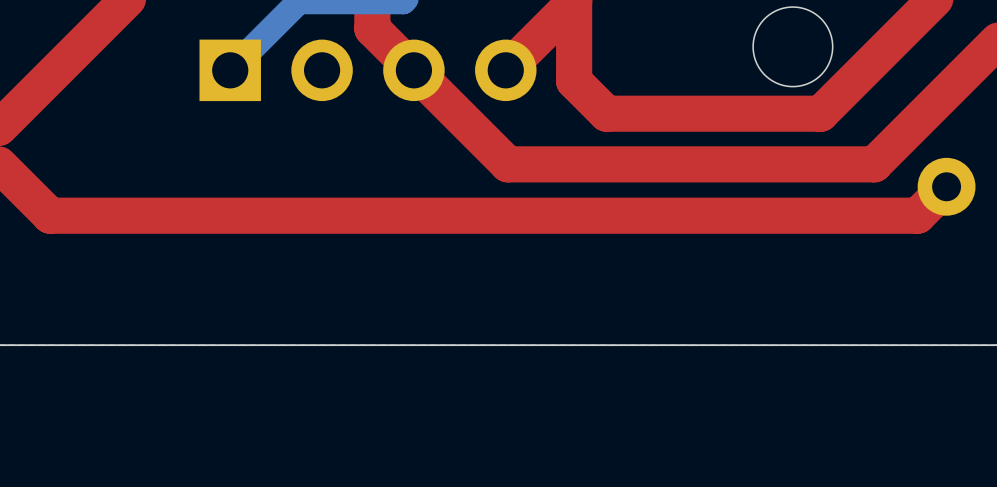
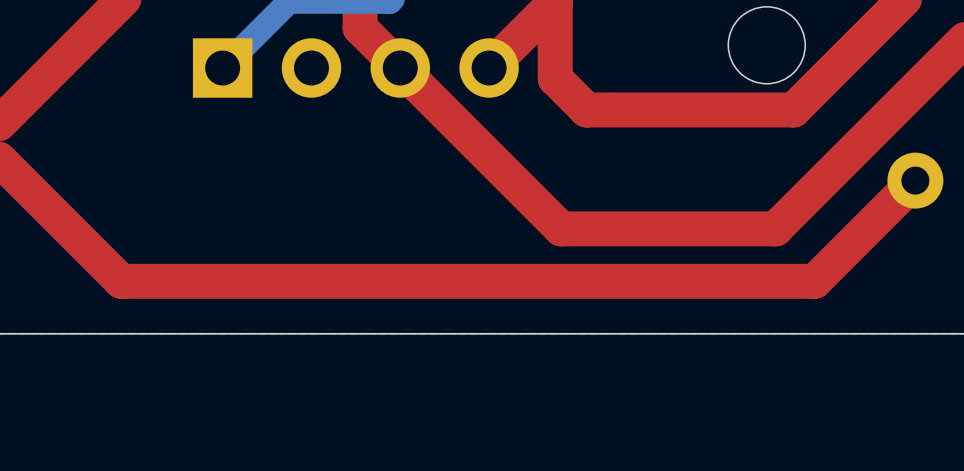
top track: (874, 164) (507, 164) -> (845, 158) (775, 228) (561, 228) (491, 158)
top track: (917, 215) (50, 215) -> (887, 208) (814, 281) (121, 281) (48, 208)

